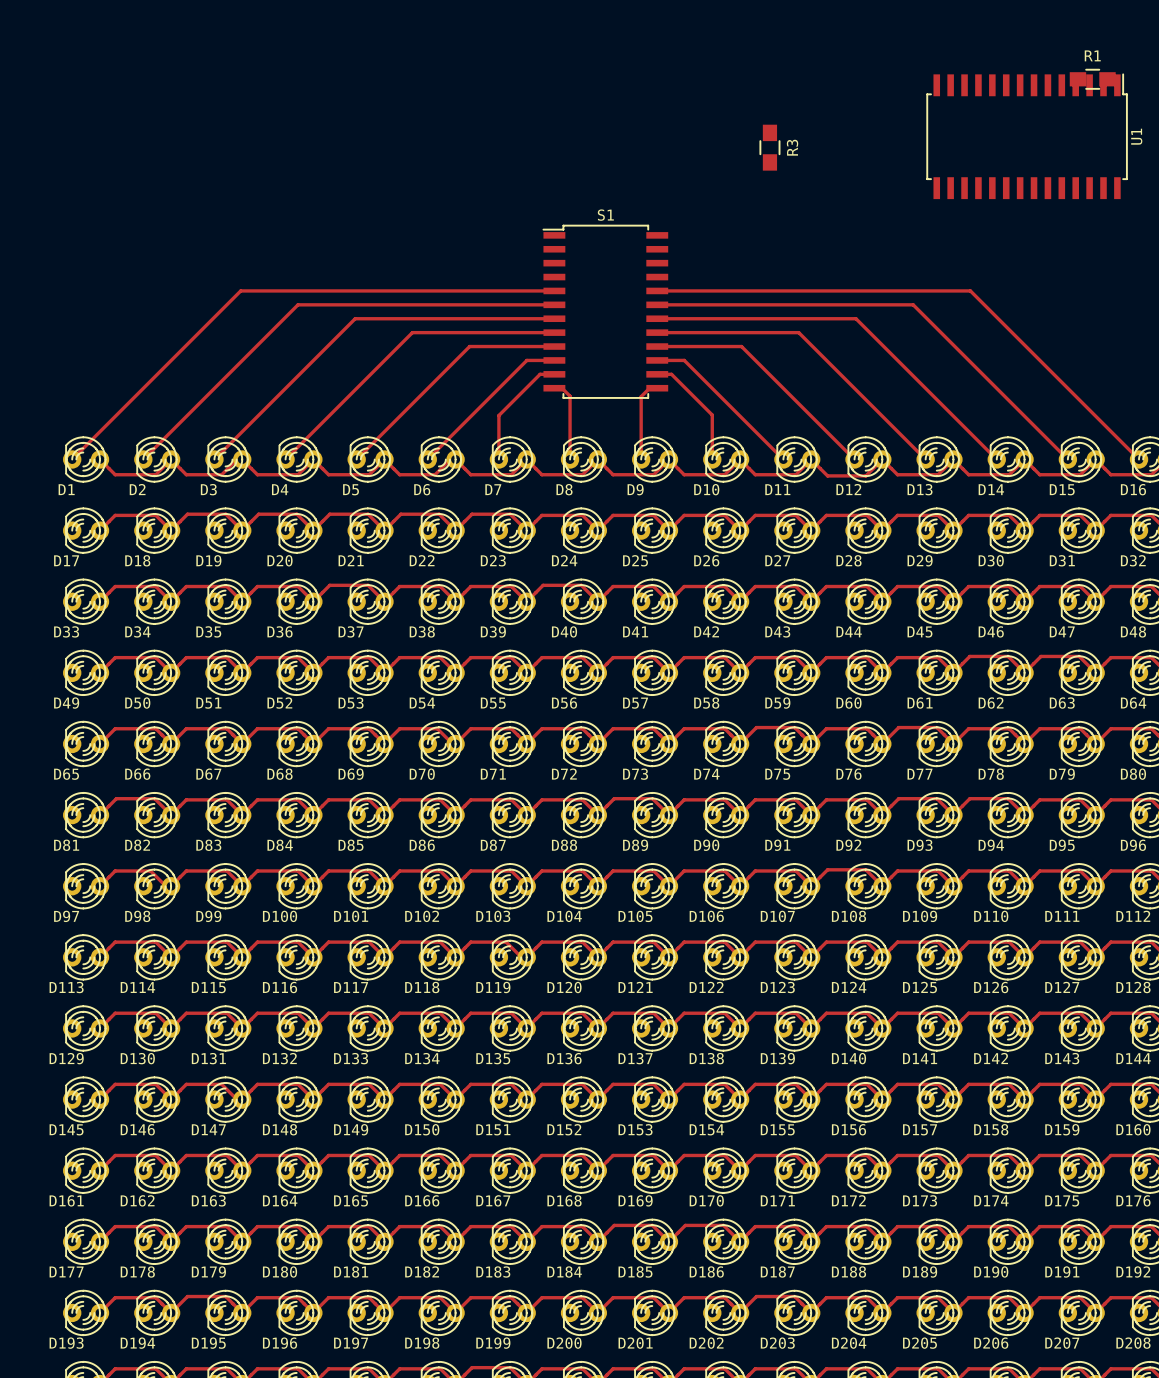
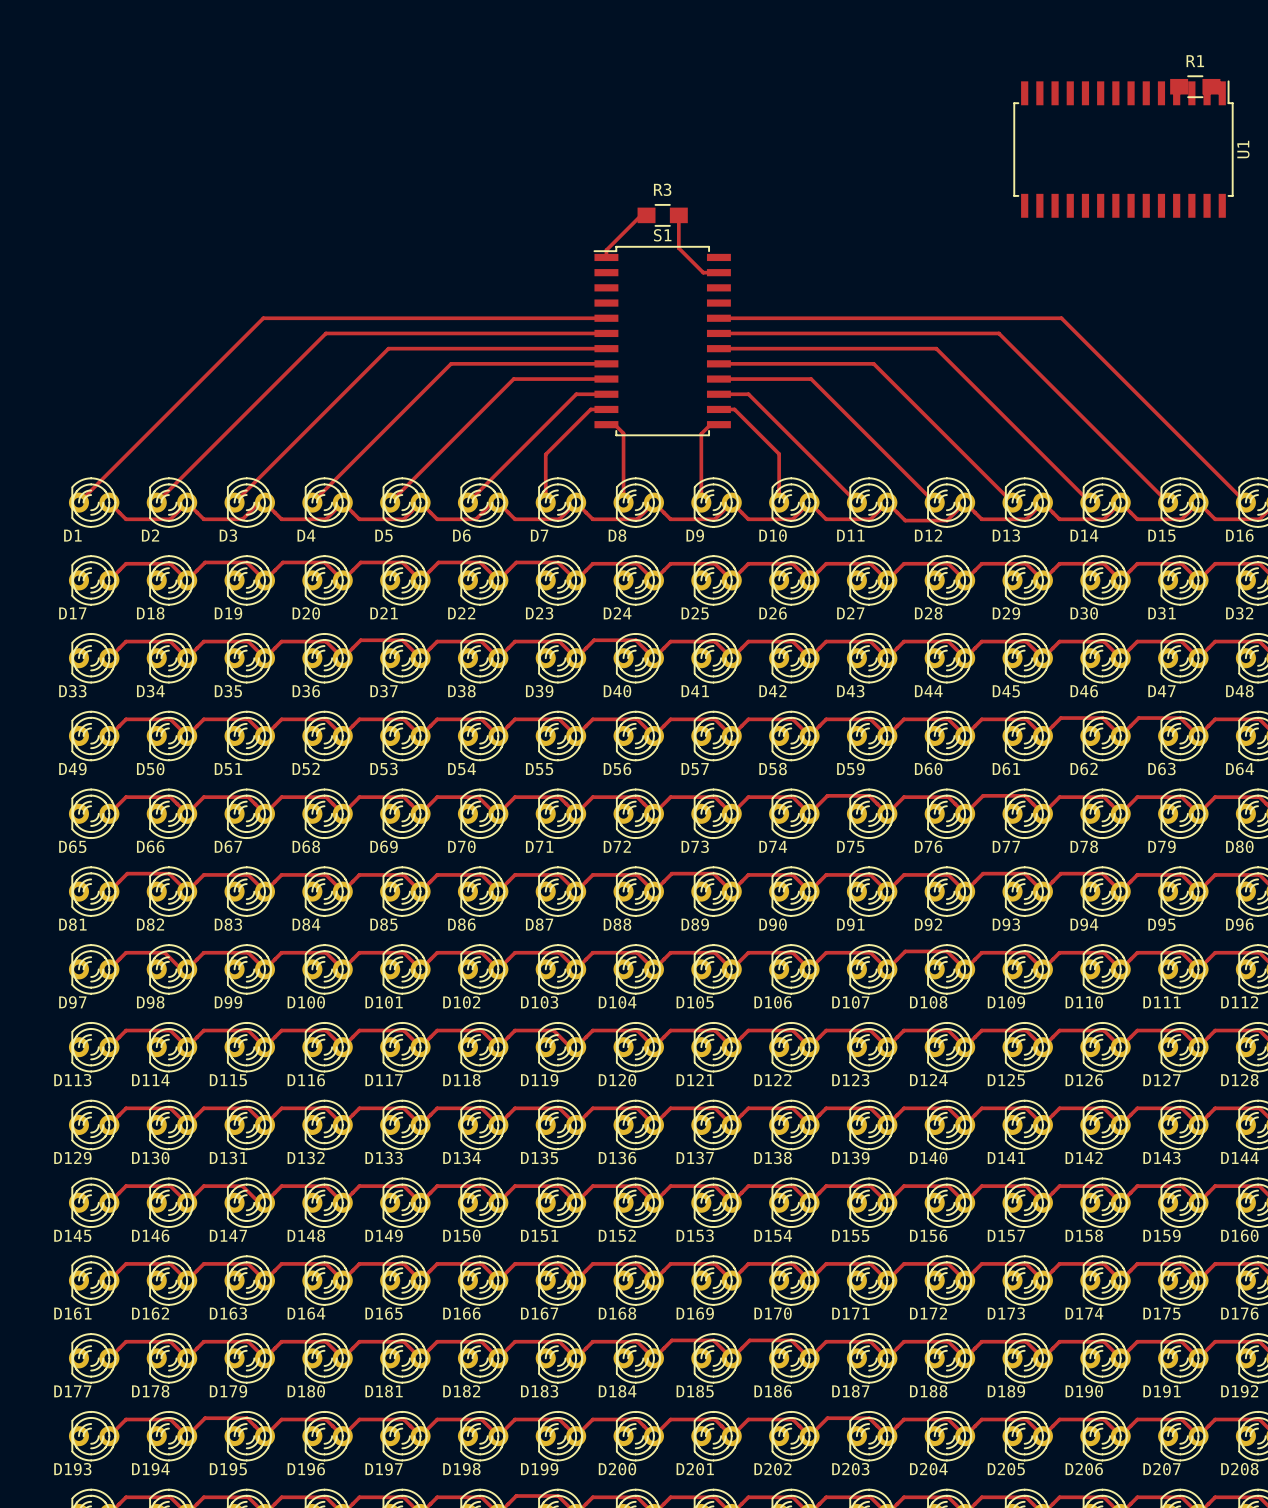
R3 rotation: 0° (769, 147) -> 90° clockwise (662, 215)
R3 position: (769, 147) -> (662, 215)
R3 name position: R3 (792, 147) -> R3 (662, 189)
track: none -> (646, 215) (641, 215) (606, 250) (606, 257)
track: none -> (678, 215) (678, 248) (703, 272) (718, 272)

